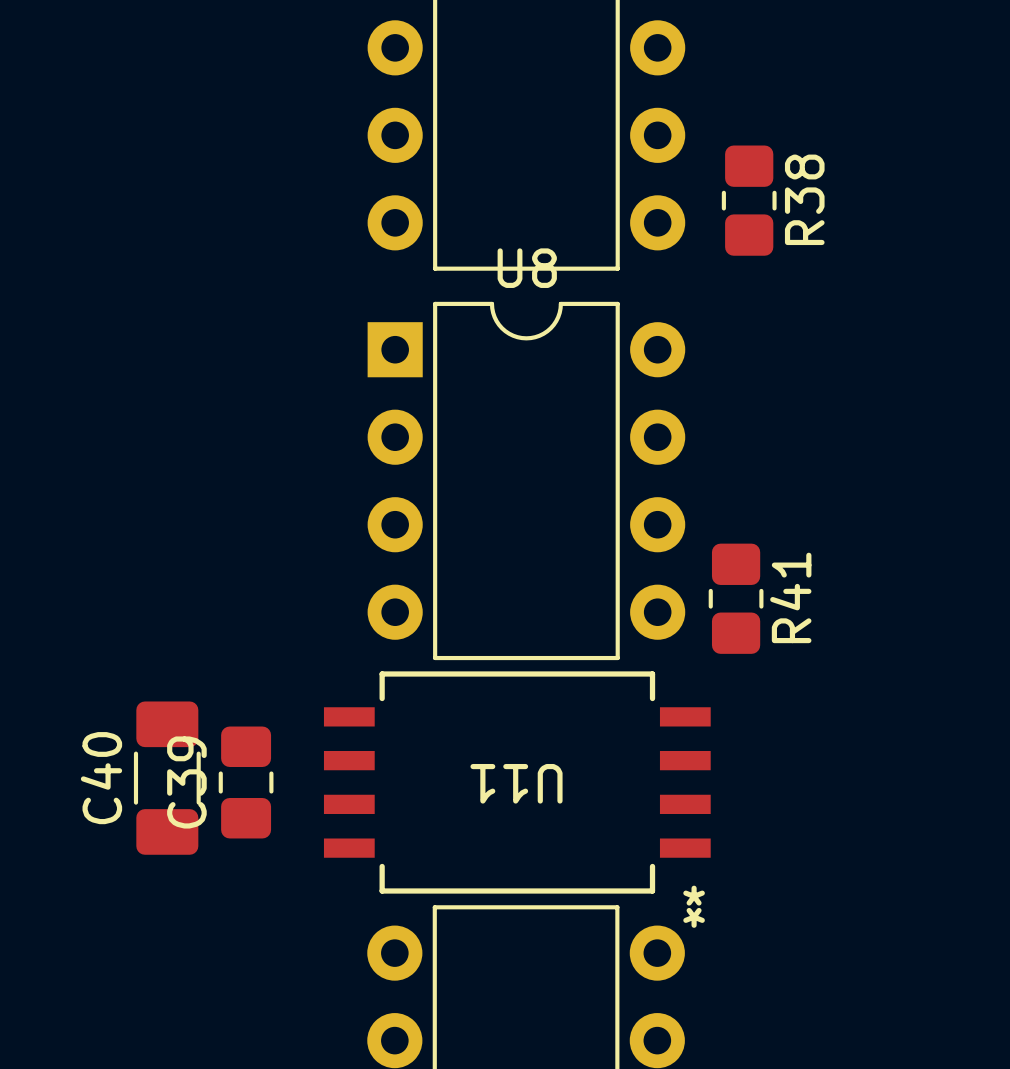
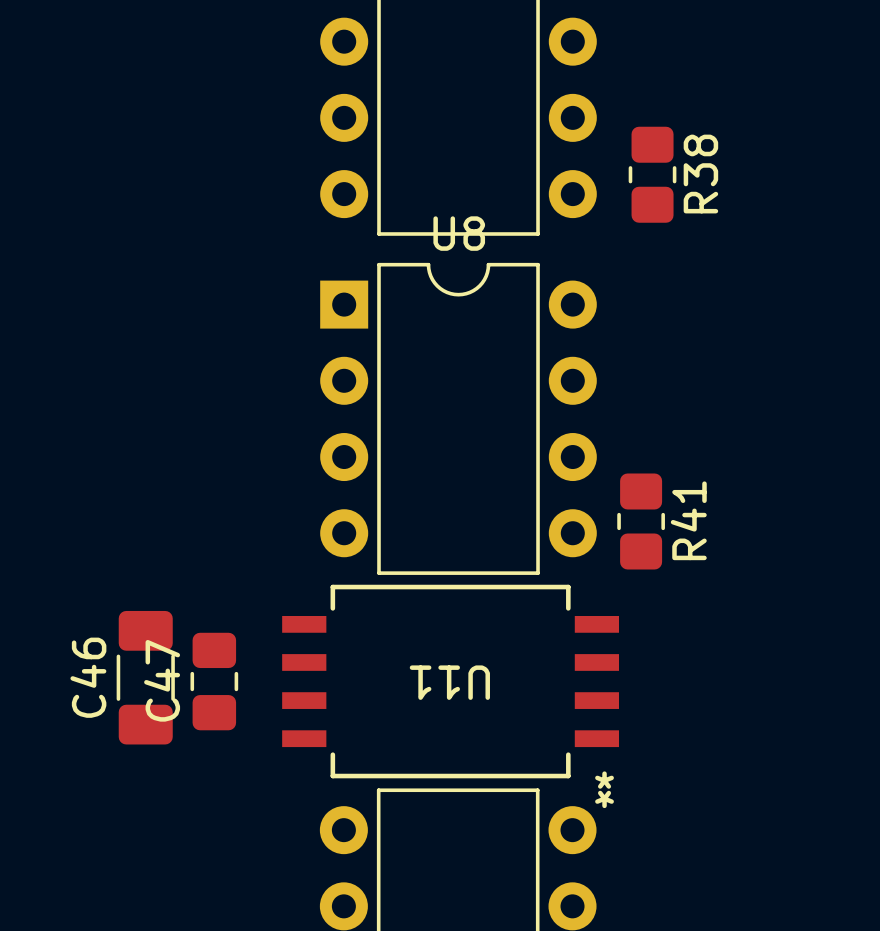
C40 name: C40 (101, 778) -> C46 (88, 677)
C39 name: C39 (186, 782) -> C47 (162, 680)

